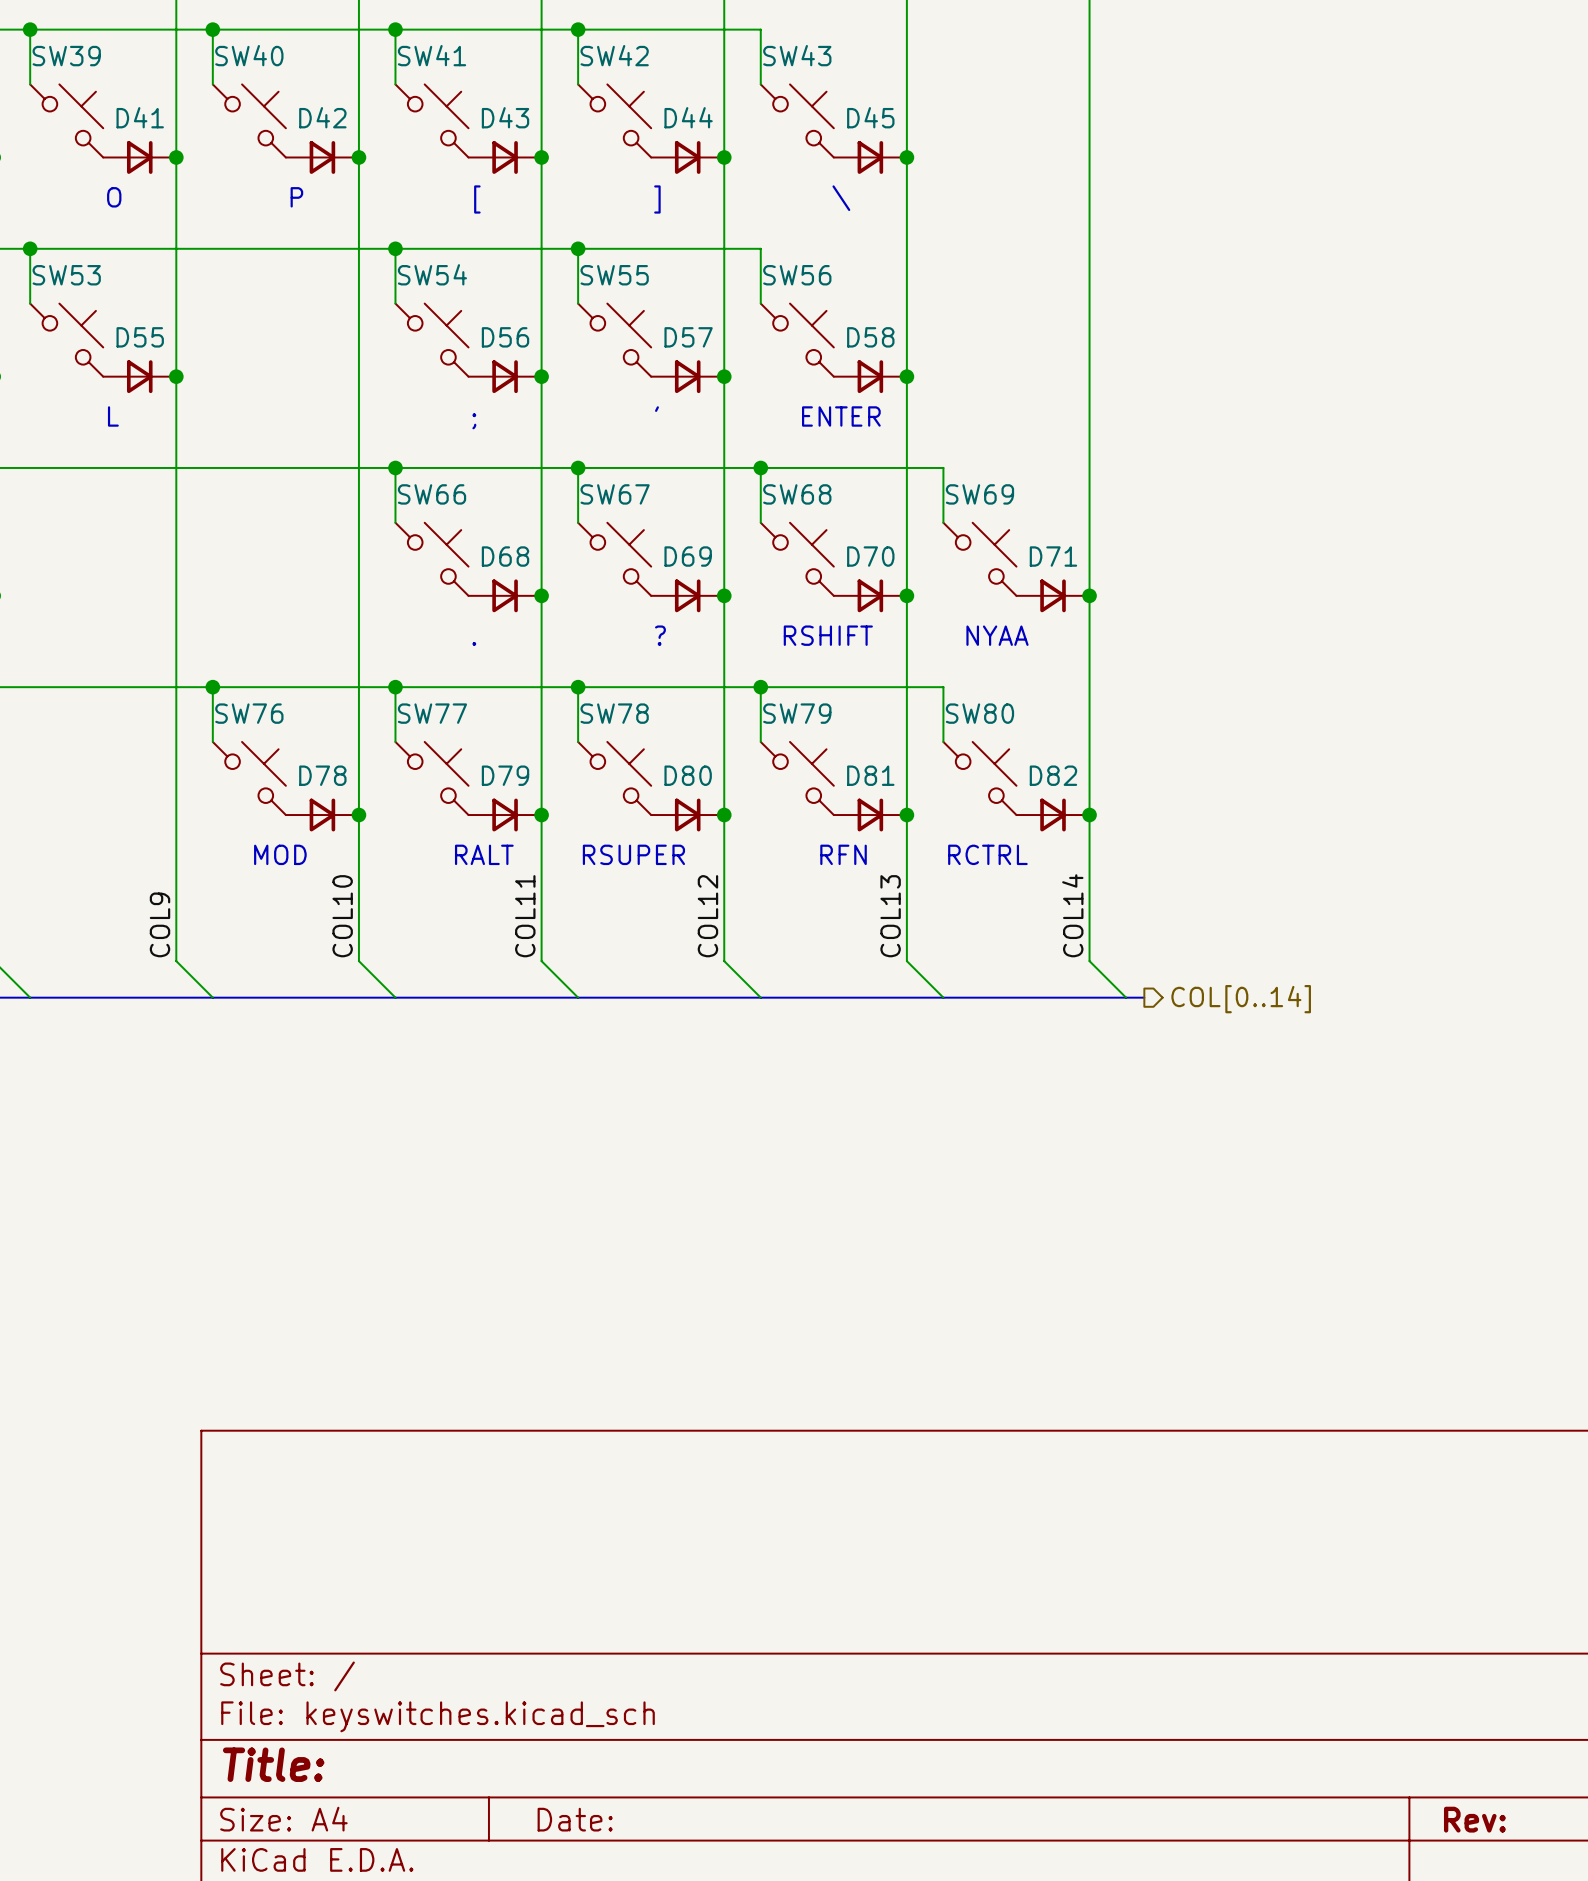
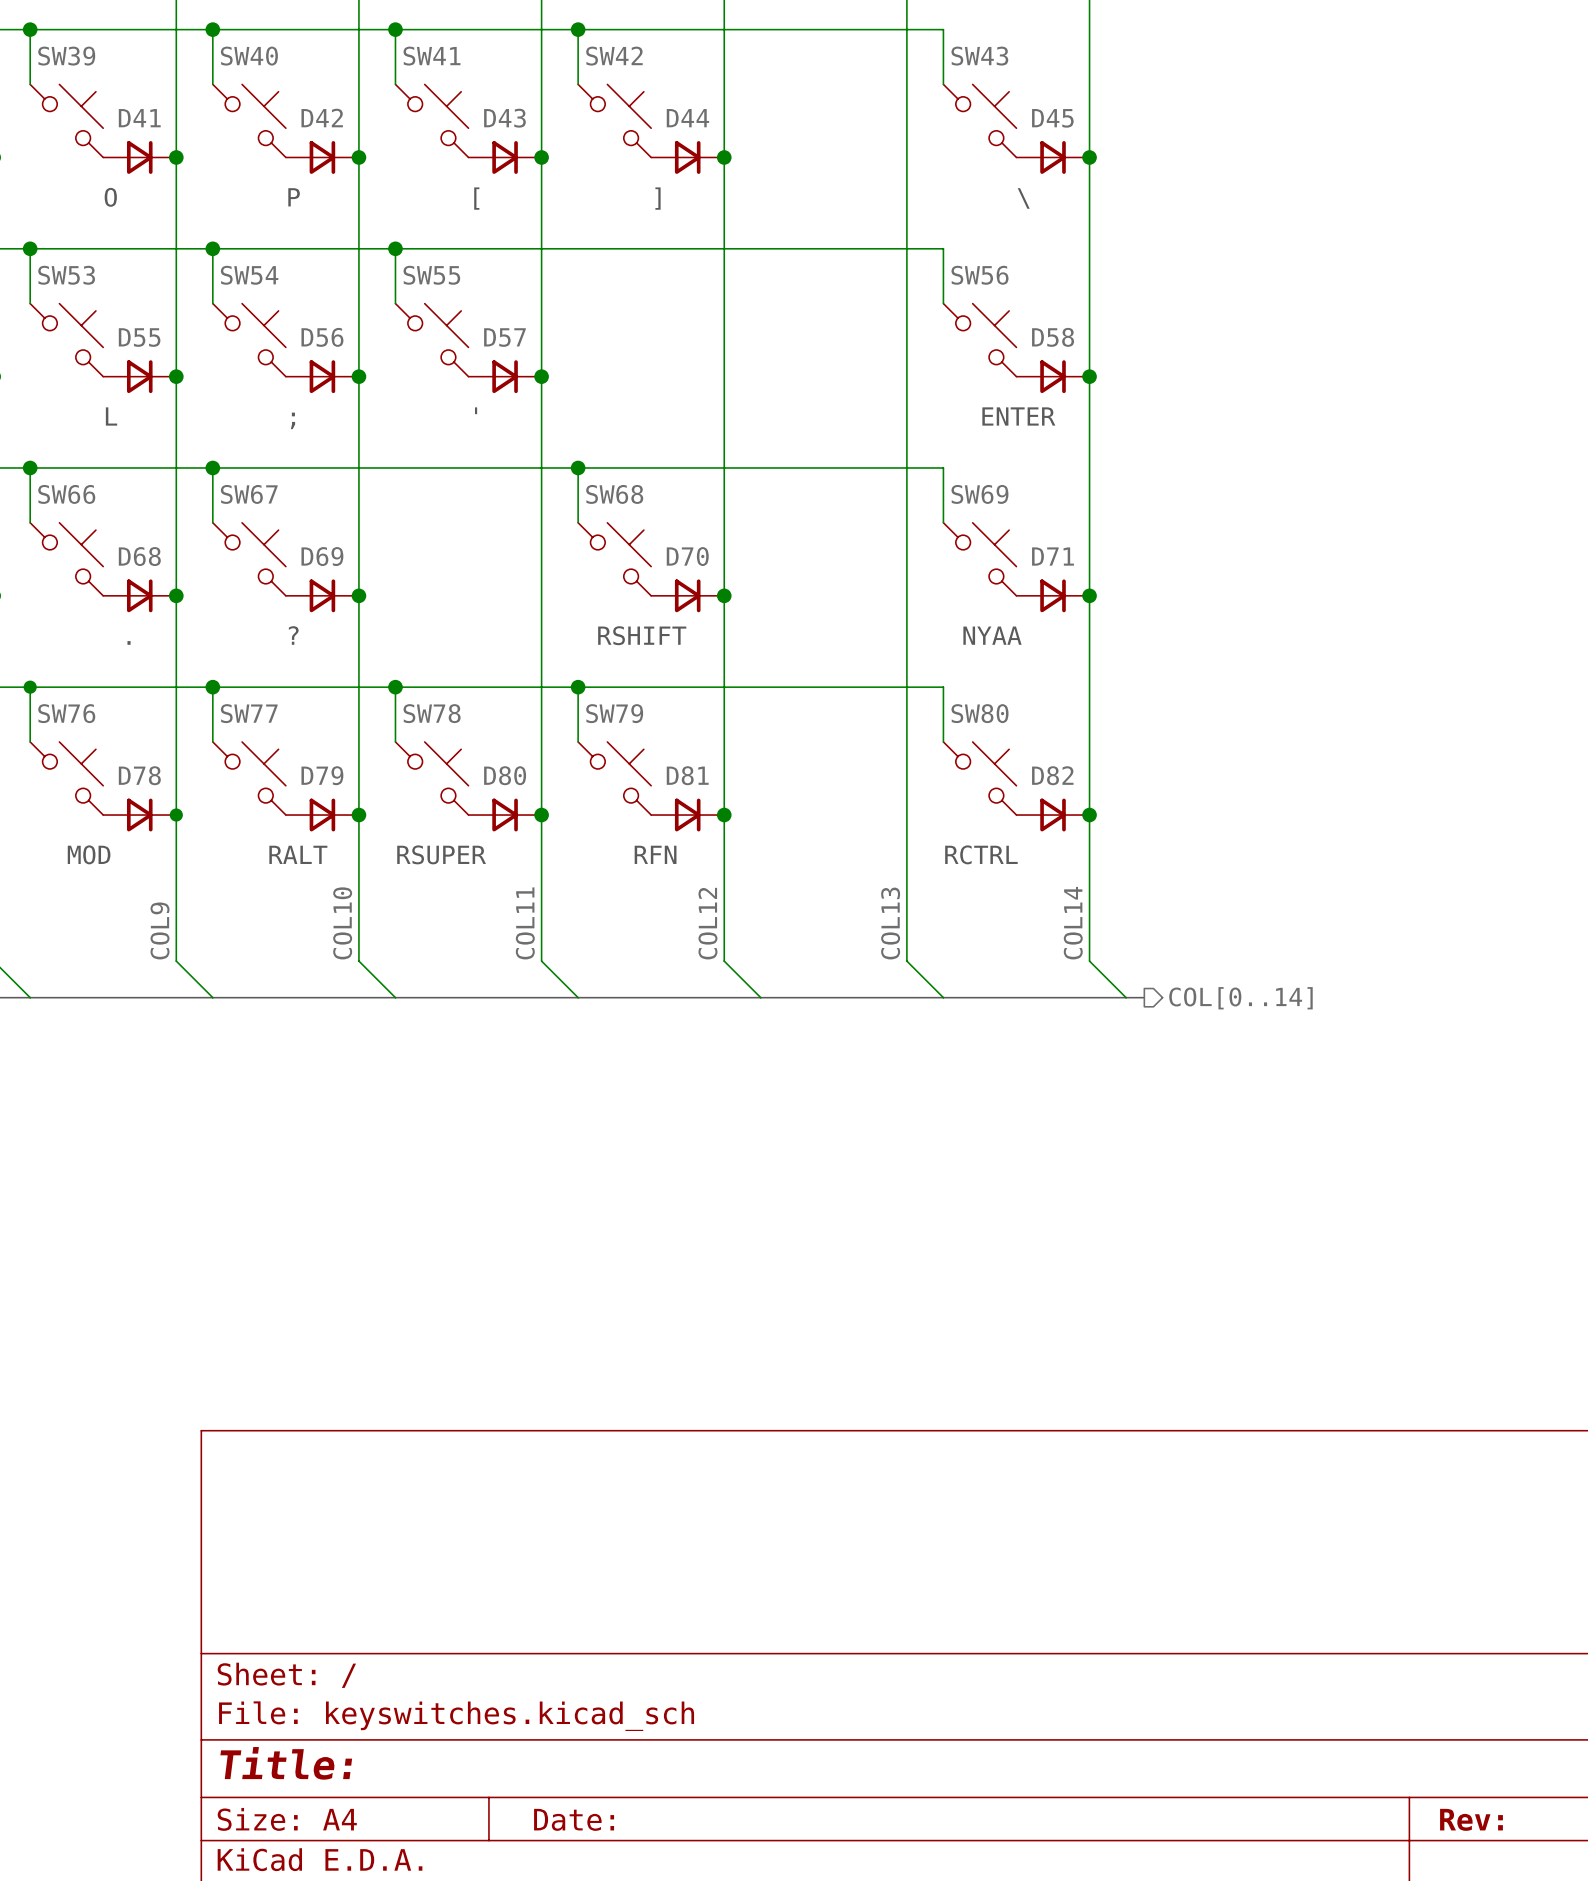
wire: (760, 29) (760, 84) -> (760, 29) (943, 29) (943, 84)
SW43 position: (797, 120) -> (979, 120)
D45 position: (870, 157) -> (1053, 157)
junction: (906, 157) -> none
junction: none -> (1089, 157)
text position: \ (841, 198) -> \ (1023, 198)
wire: none -> (212, 248) (212, 303)
junction: none -> (212, 248)
wire: (578, 248) (578, 303) -> none
junction: (578, 248) -> none
wire: (760, 248) (760, 303) -> (760, 248) (943, 248) (943, 303)
SW54 name: SW54 (432, 274) -> SW55 (431, 275)
D56 name: D56 (505, 337) -> D57 (504, 337)
SW54: none -> (249, 340)
SW55: (614, 340) -> none
SW56 position: (797, 340) -> (979, 340)
D56: none -> (322, 376)
junction: none -> (358, 376)
D57: (687, 376) -> none
junction: (724, 376) -> none
D58 position: (870, 376) -> (1053, 376)
junction: (906, 376) -> none
junction: none -> (1089, 376)
text: ' (656, 409) -> none
text position: ENTER (841, 416) -> ENTER (1018, 416)
text: none -> ; (292, 420)
text: ; (474, 421) -> ' (476, 410)
wire: none -> (30, 467) (30, 522)
junction: none -> (30, 467)
junction: none -> (212, 467)
wire: (395, 467) (395, 522) -> (212, 467) (212, 522)
junction: (395, 467) -> none
wire: (760, 467) (760, 522) -> none
junction: (760, 467) -> none
SW67 name: SW67 (615, 494) -> SW68 (614, 494)
D69 name: D69 (688, 556) -> D70 (687, 556)
SW67: none -> (249, 559)
SW66 position: (432, 559) -> (66, 559)
SW68: (797, 559) -> none
junction: none -> (176, 595)
D69: none -> (322, 595)
junction: none -> (358, 595)
D68 position: (505, 595) -> (139, 595)
junction: (541, 595) -> none
D70: (870, 595) -> none
junction: (906, 595) -> none
text: none -> ? (293, 635)
text: ? (660, 635) -> none
text position: RSHIFT (828, 635) -> RSHIFT (642, 635)
text position: . (474, 643) -> . (129, 642)
wire: none -> (30, 687) (30, 741)
junction: none -> (30, 687)
wire: (760, 687) (760, 741) -> none
junction: (760, 687) -> none
SW76 name: SW76 (249, 713) -> SW77 (249, 713)
SW77 name: SW77 (432, 713) -> SW78 (432, 713)
SW78 name: SW78 (614, 713) -> SW79 (614, 713)
D78 name: D78 (322, 775) -> D79 (322, 775)
D79 name: D79 (505, 775) -> D80 (505, 775)
D80 name: D80 (688, 775) -> D81 (687, 775)
SW76: none -> (66, 778)
SW79: (797, 778) -> none
D78: none -> (139, 815)
junction: none -> (176, 815)
D81: (870, 815) -> none
junction: (906, 815) -> none
text position: MOD (280, 854) -> MOD (89, 854)
text position: RALT (484, 854) -> RALT (298, 854)
text position: RSUPER (633, 854) -> RSUPER (441, 854)
text position: RFN (843, 854) -> RFN (655, 854)

